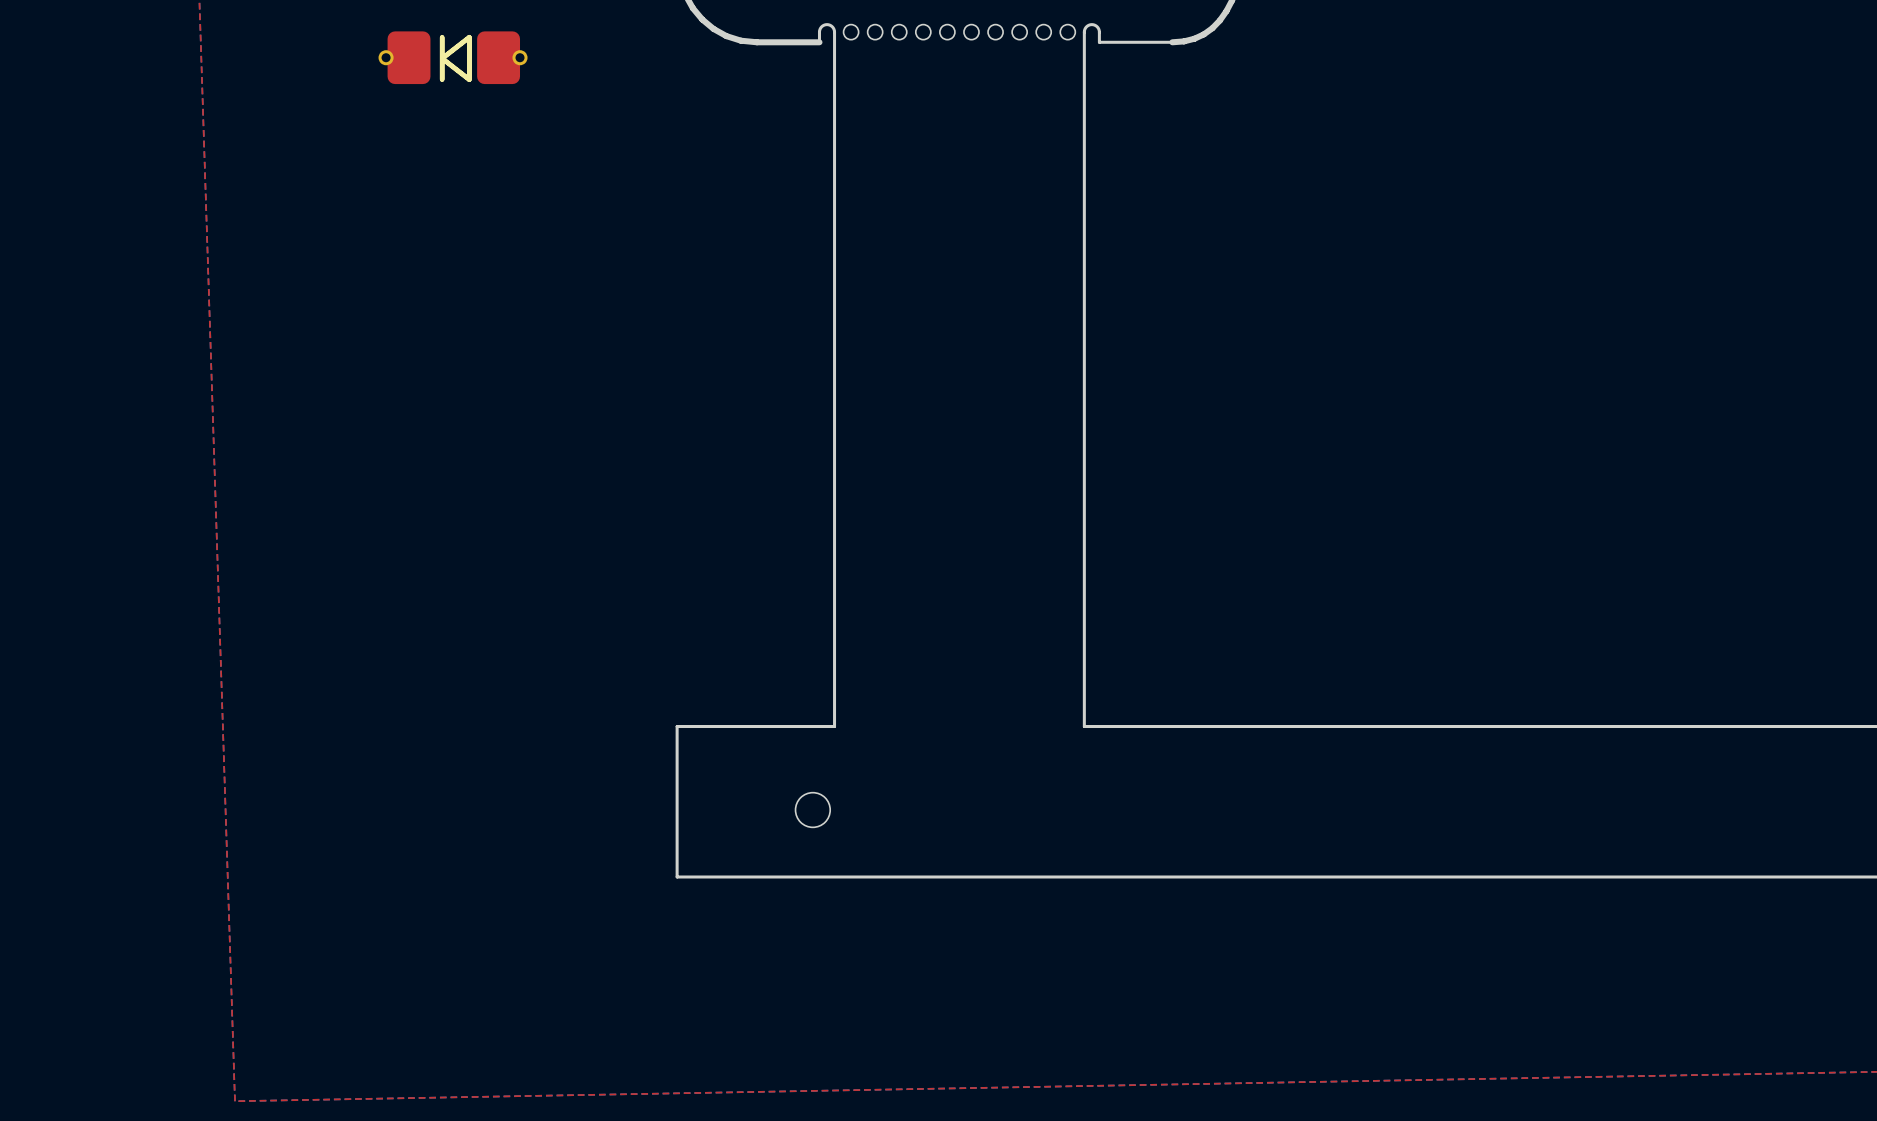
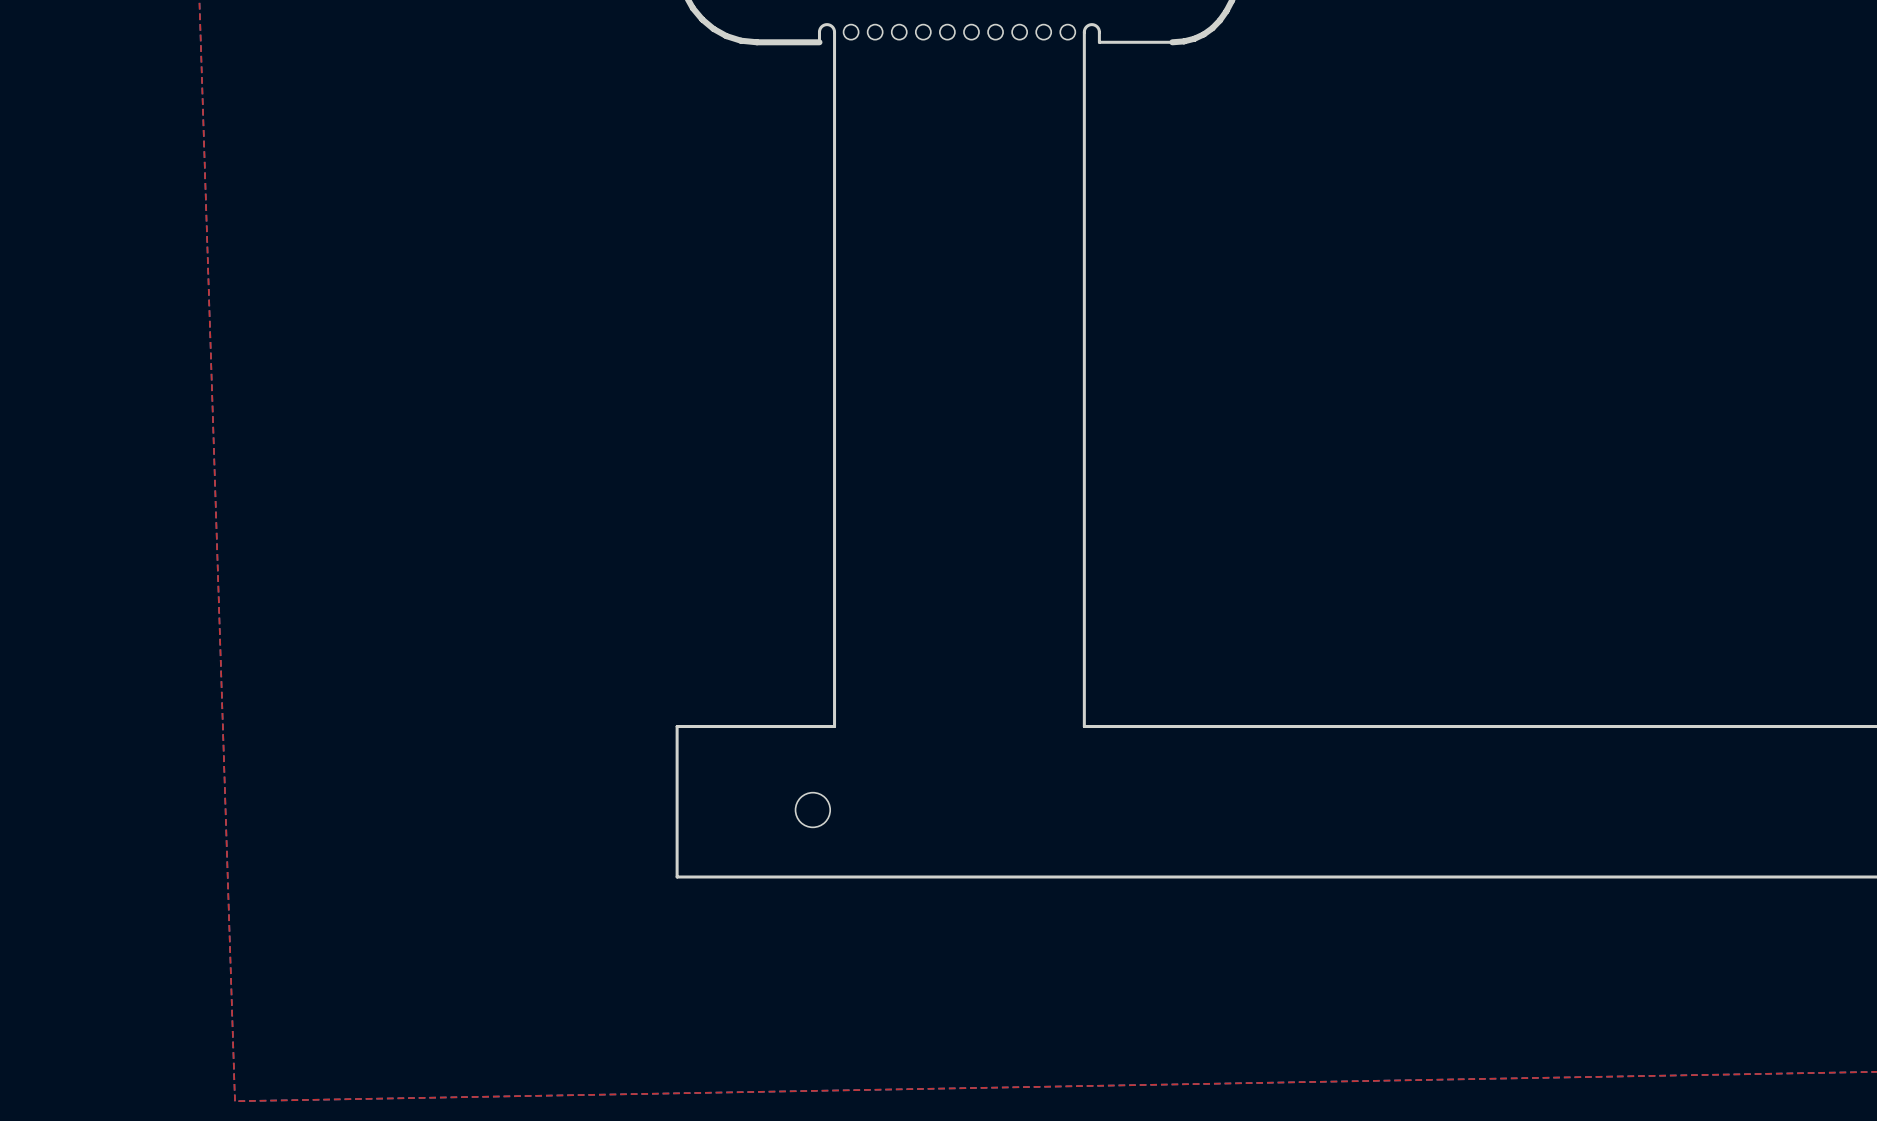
part: (453, 57) -> none

